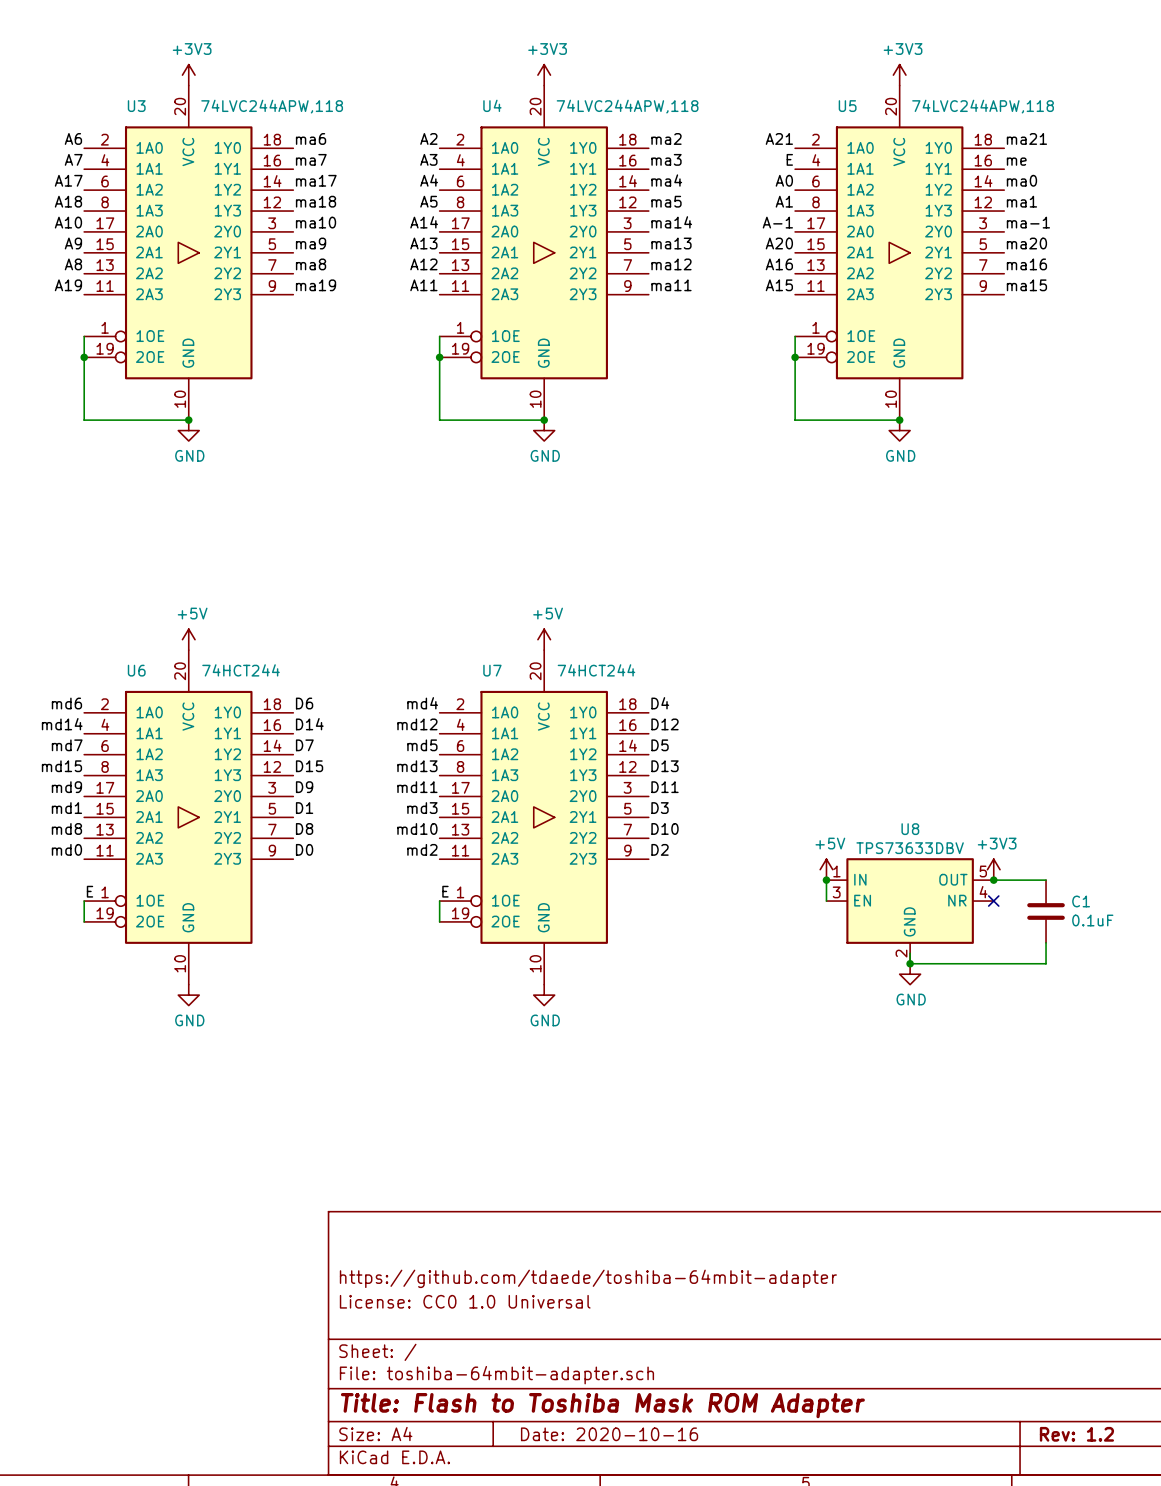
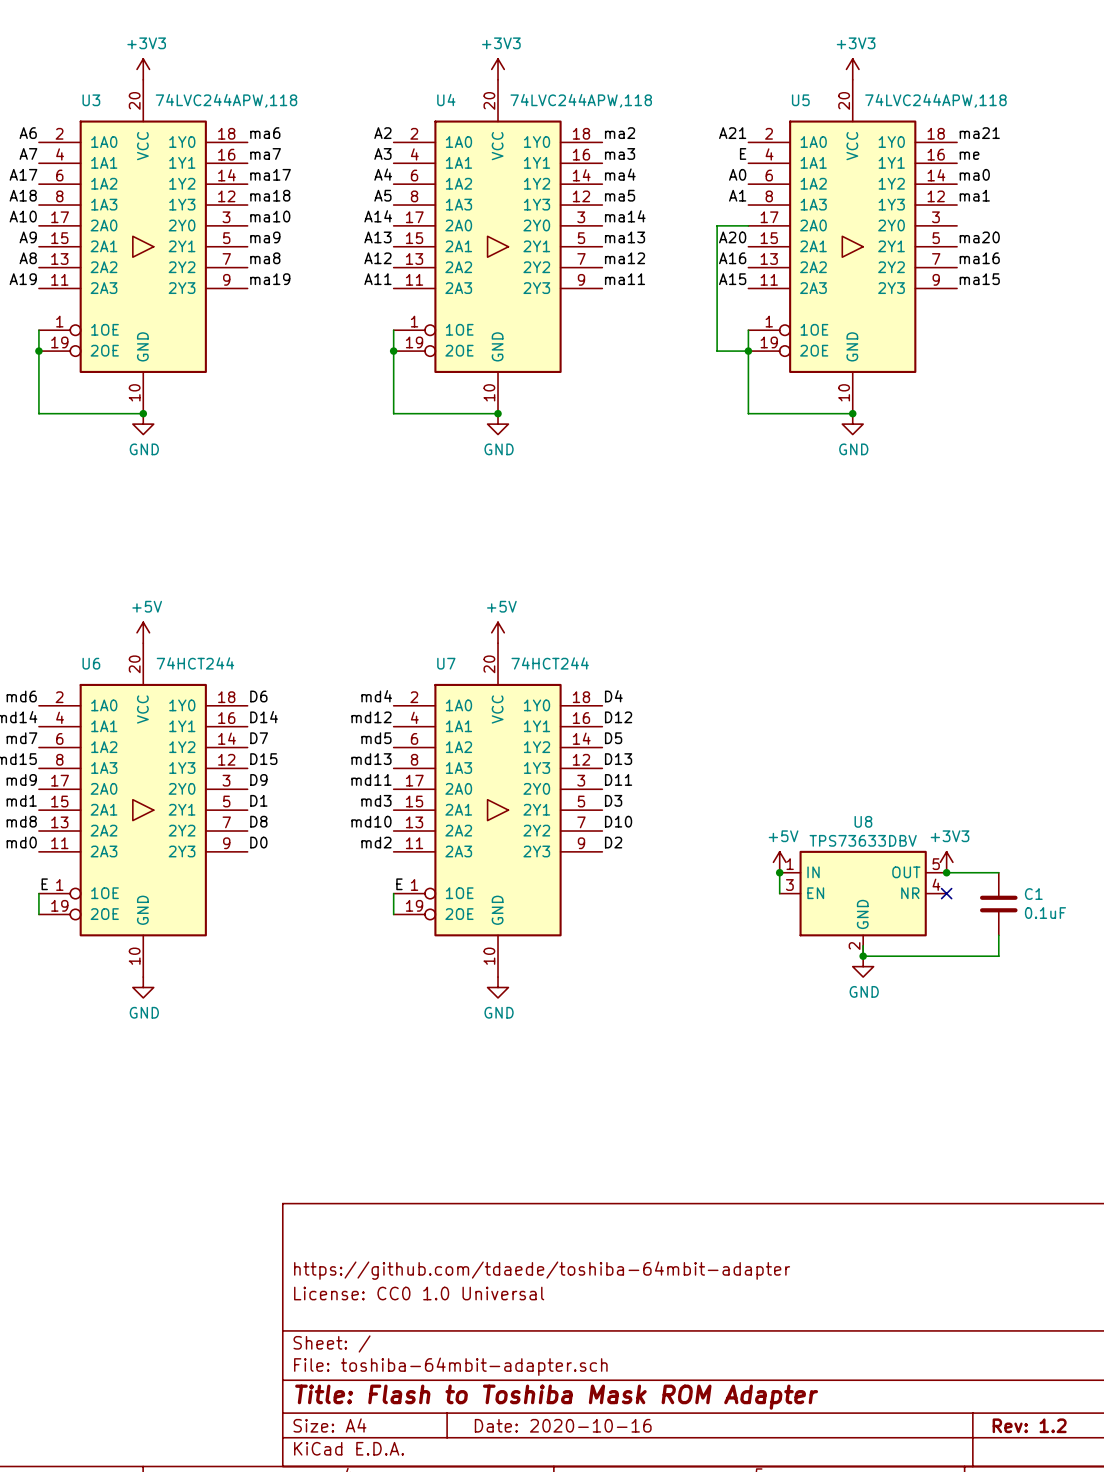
label: A-1 (777, 222) -> none
label: ma-1 (1028, 222) -> none
wire: none -> (748, 225) (717, 225) (717, 351) (748, 351)

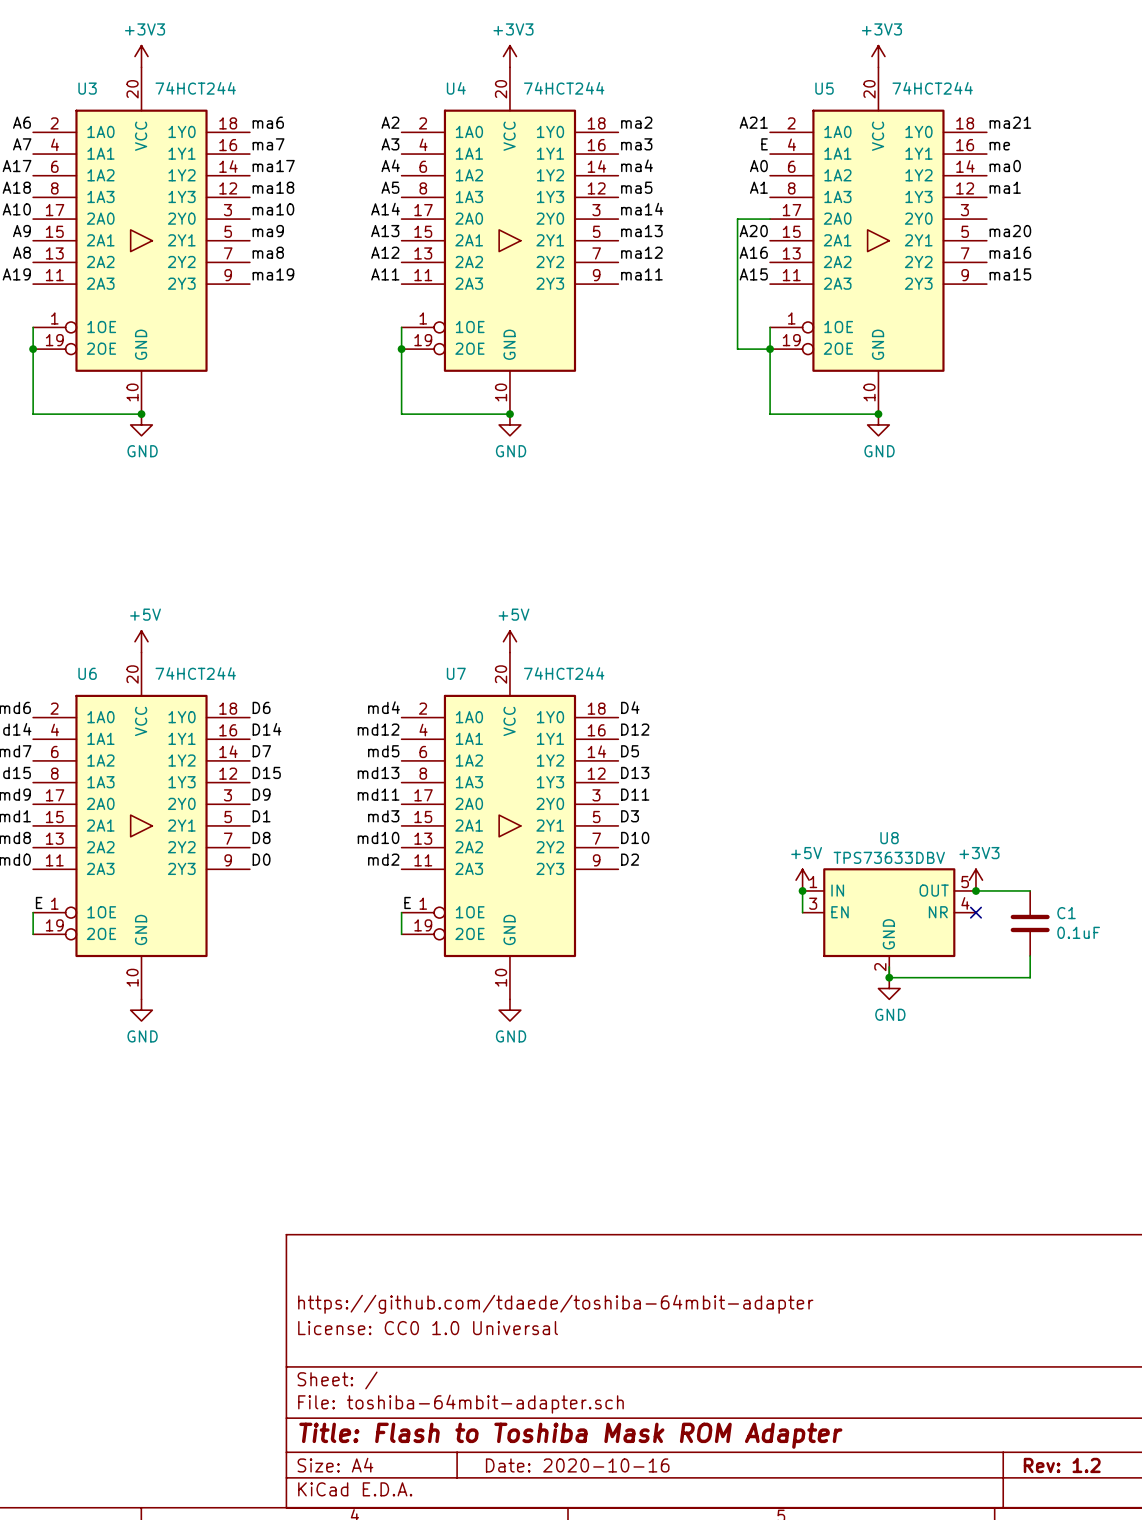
U3 value: 74LVC244APW,118 (226, 100) -> 74HCT244 (195, 88)
U4 value: 74LVC244APW,118 (581, 100) -> 74HCT244 (564, 88)
U5 value: 74LVC244APW,118 (935, 100) -> 74HCT244 (932, 88)

